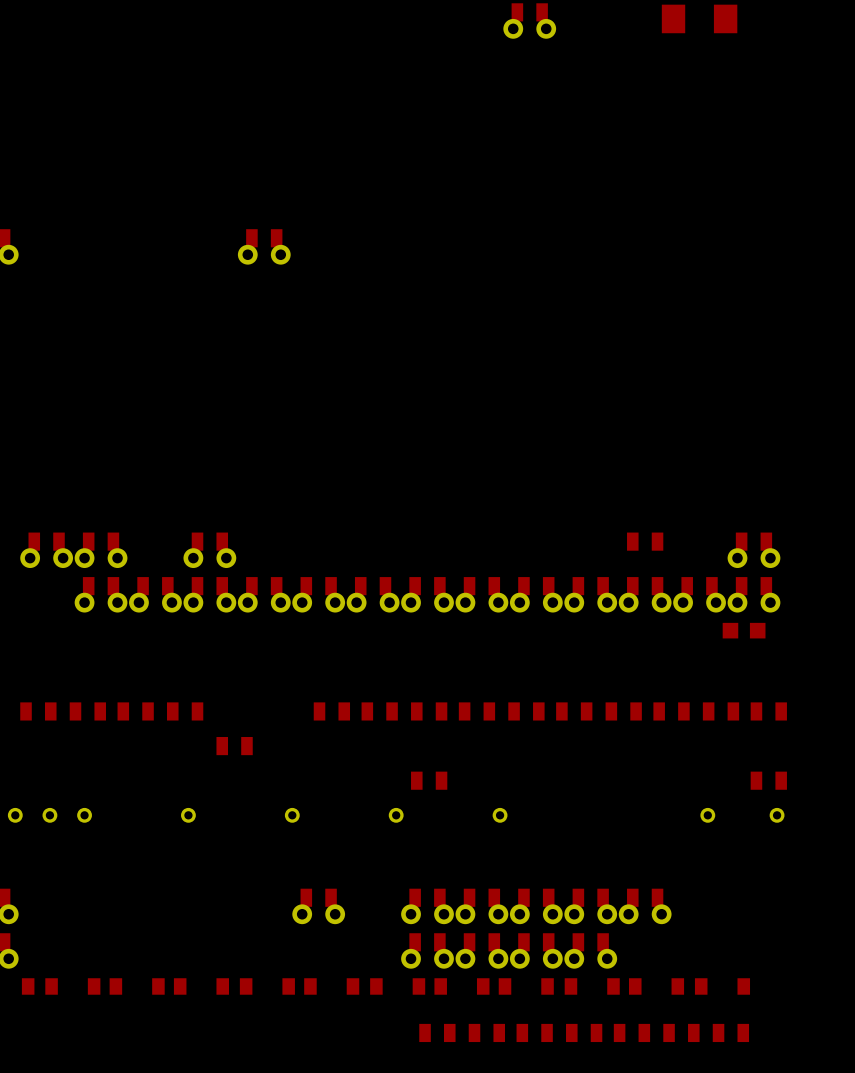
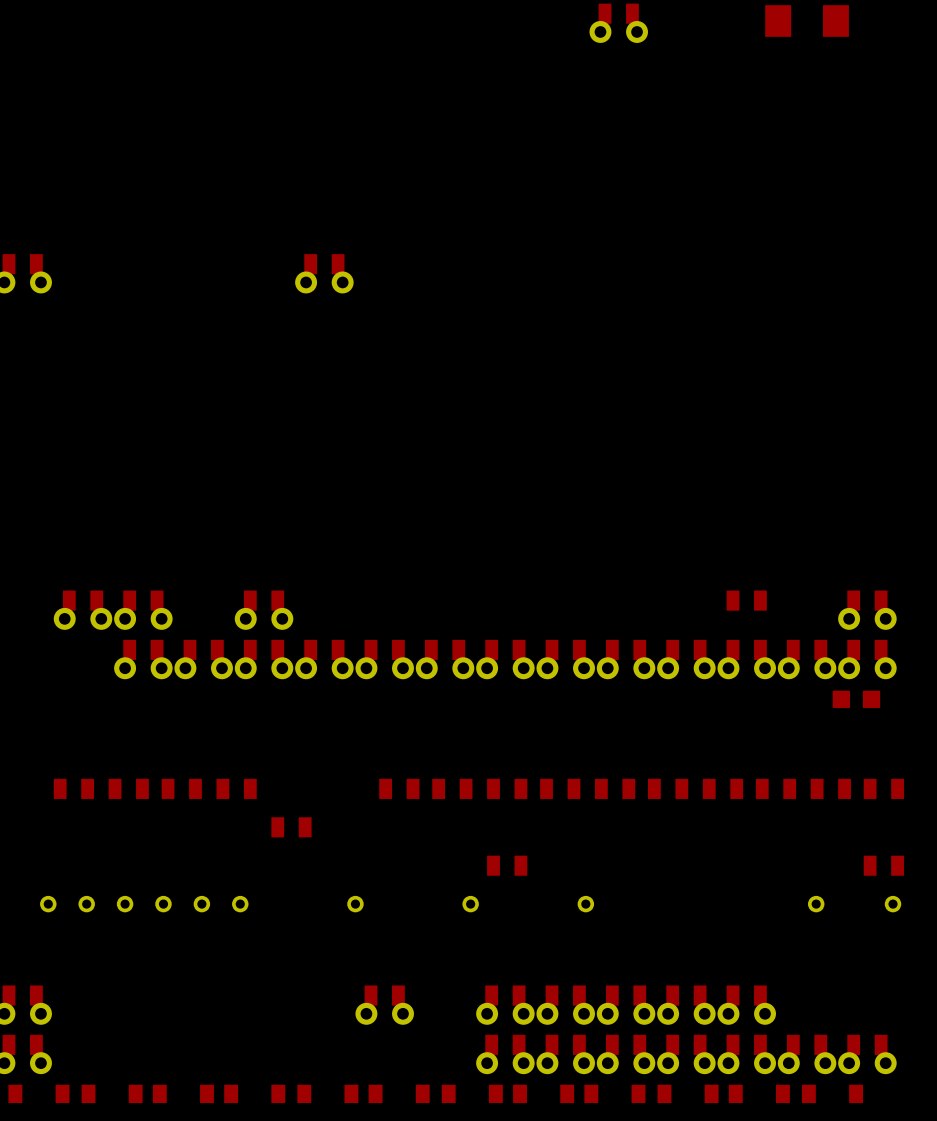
part: none -> (163, 904)
part: none -> (201, 904)
part: none -> (746, 1054)
part: none -> (807, 1054)
part: none -> (867, 1054)

